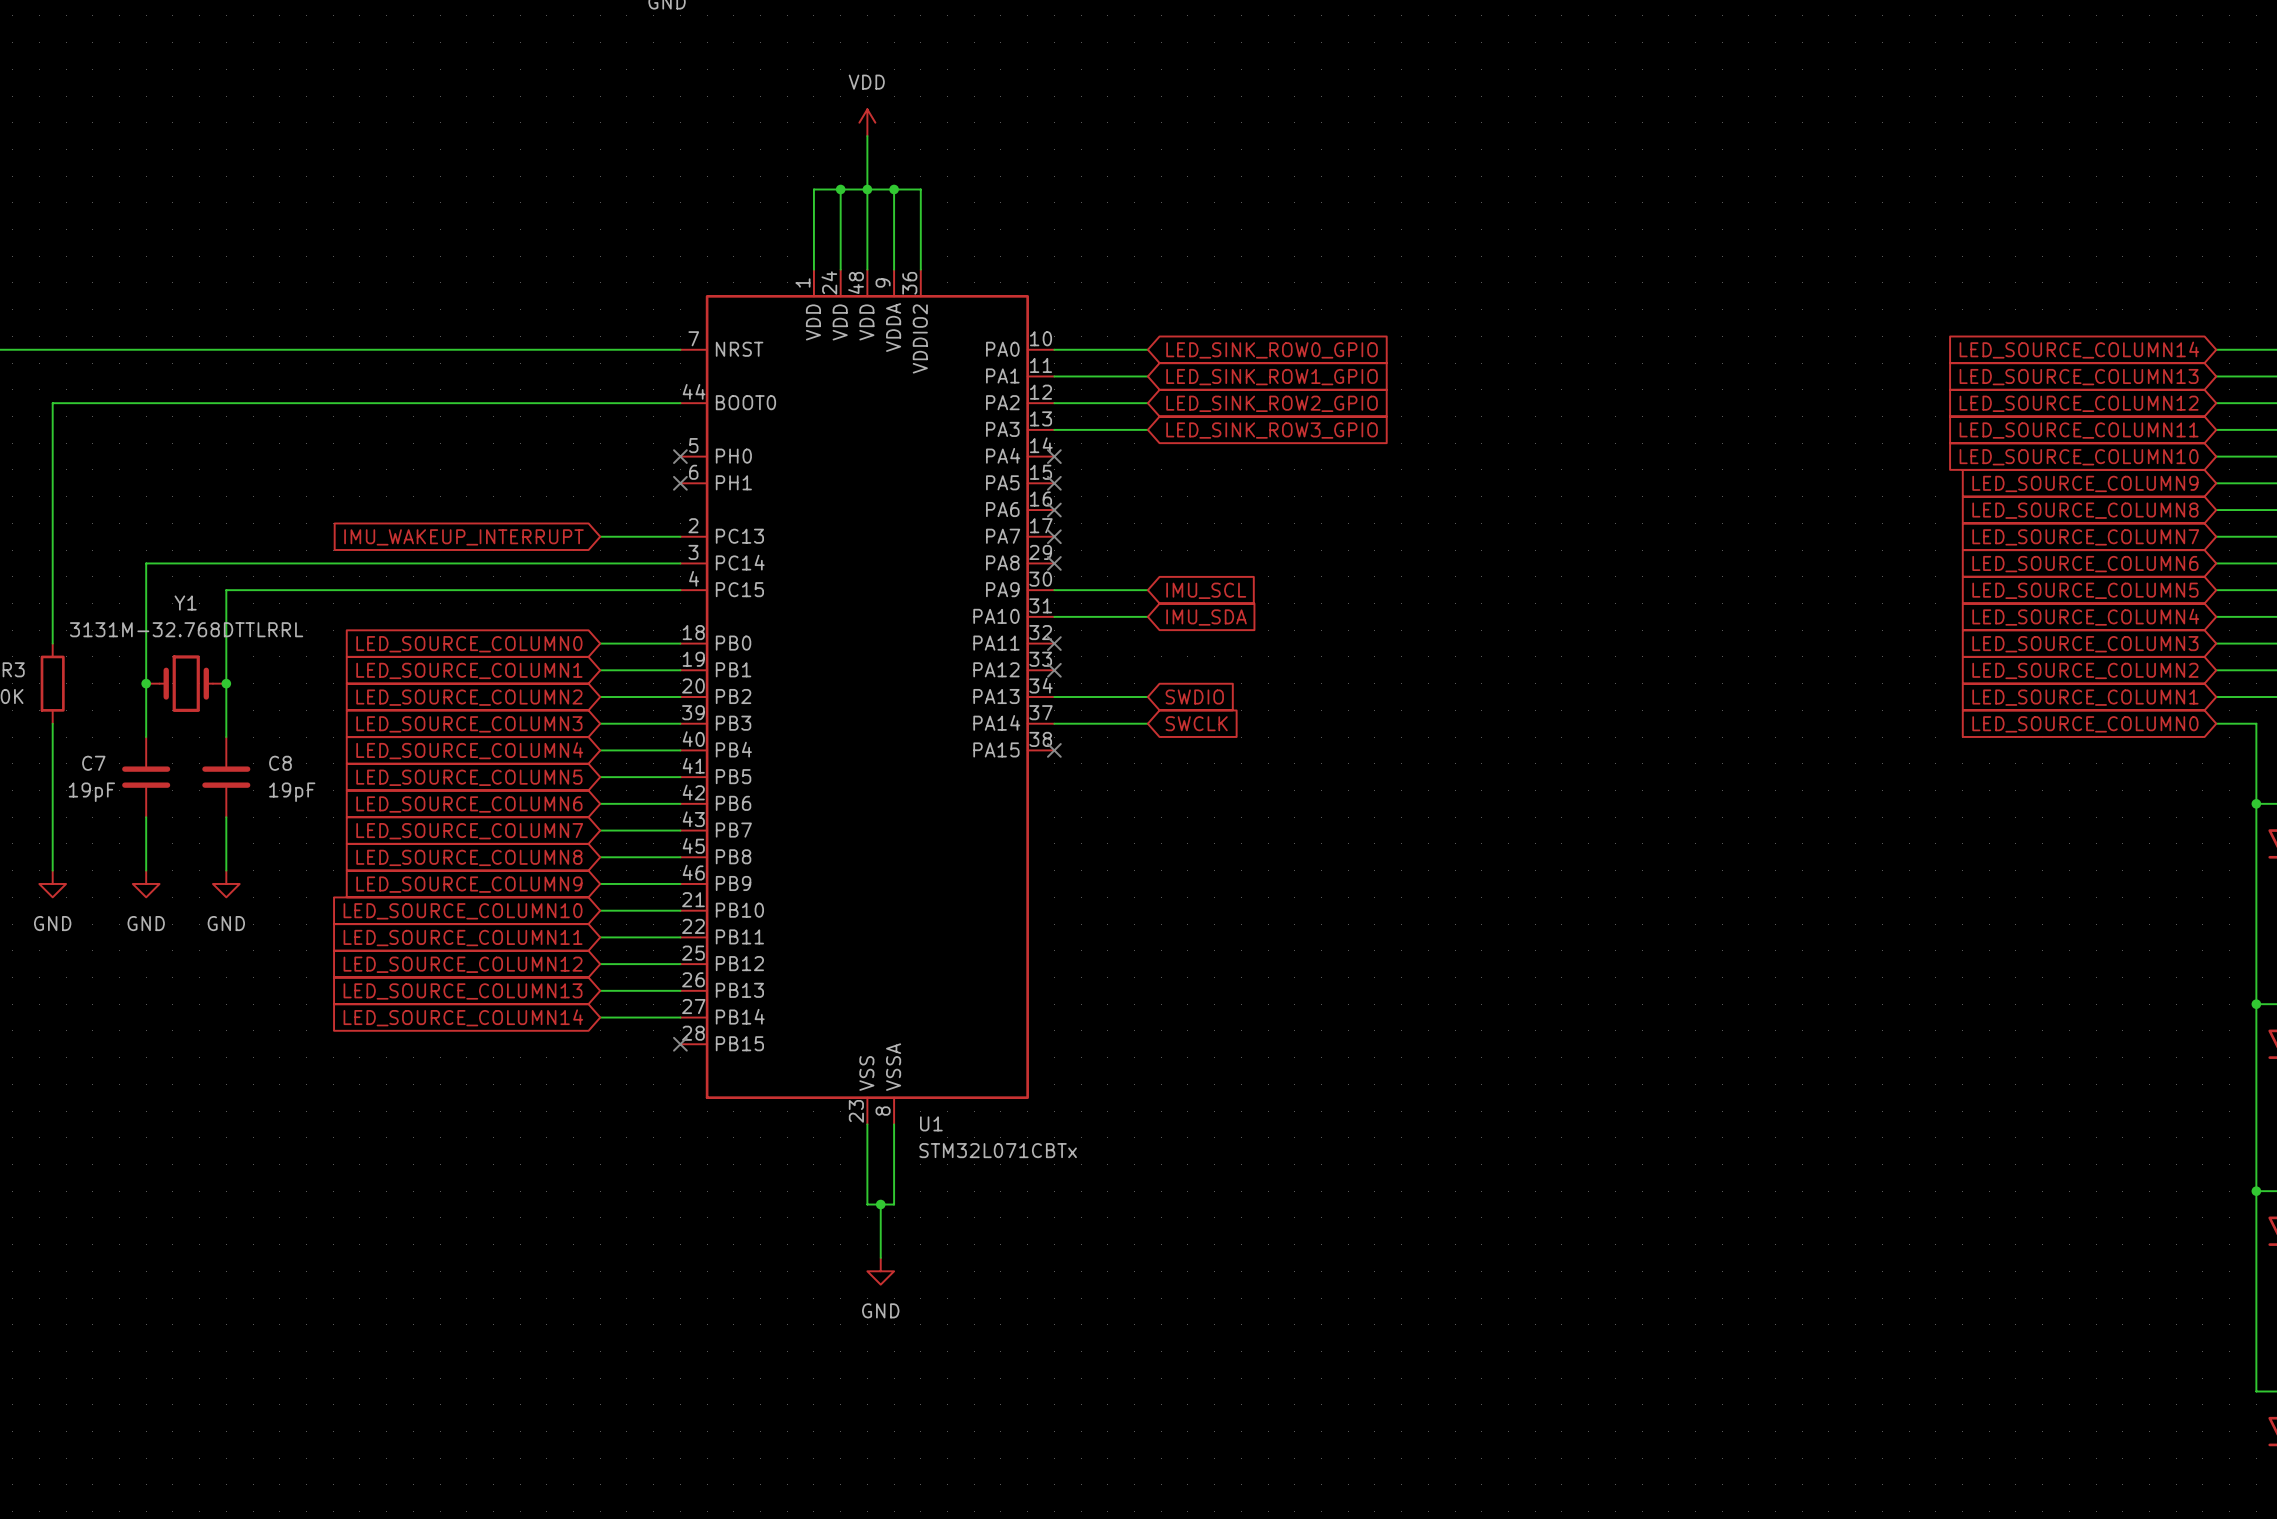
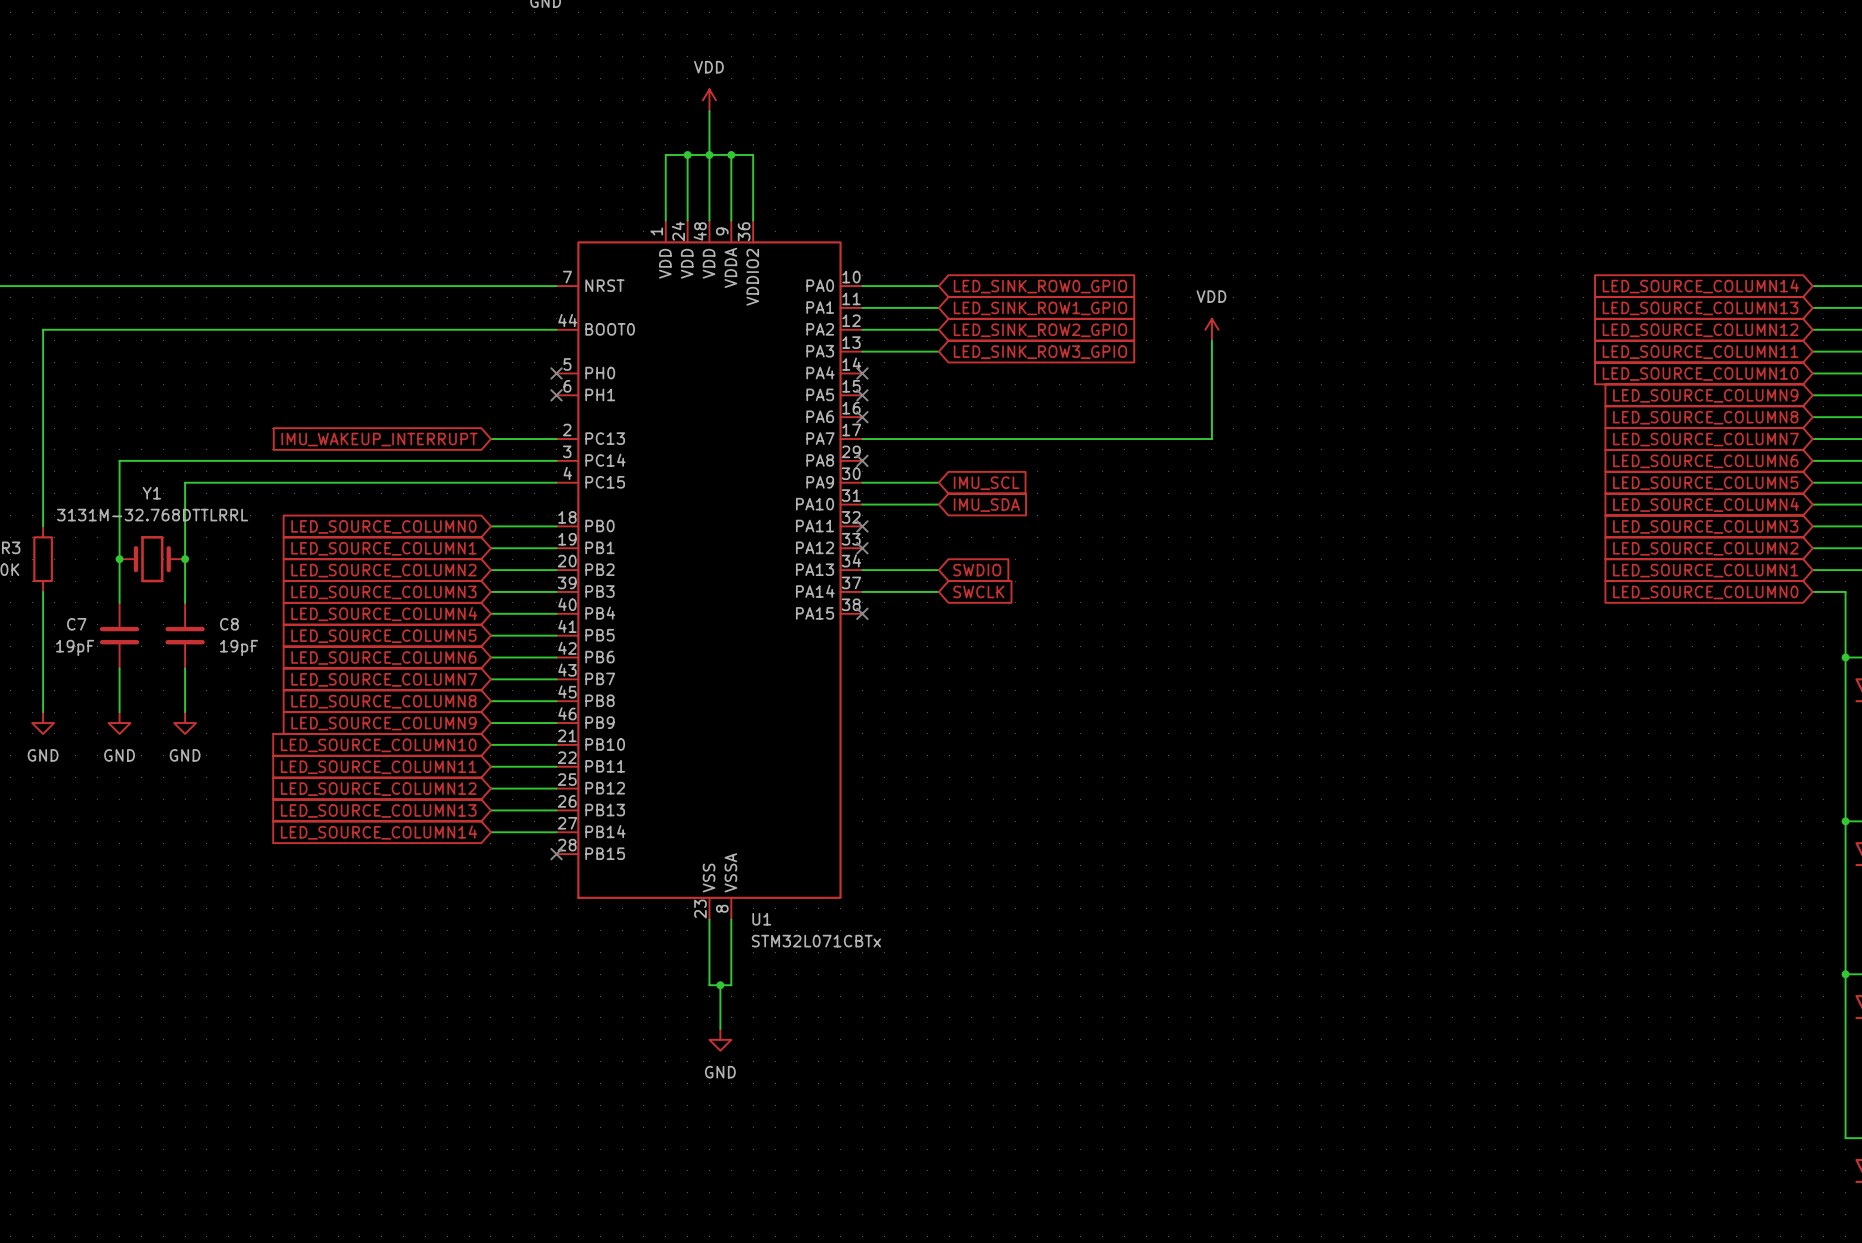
power symbol: none -> VDD (1211, 329)
wire: none -> (1211, 340) (1211, 439) (862, 439)
no-connect mark: (1054, 536) -> none

